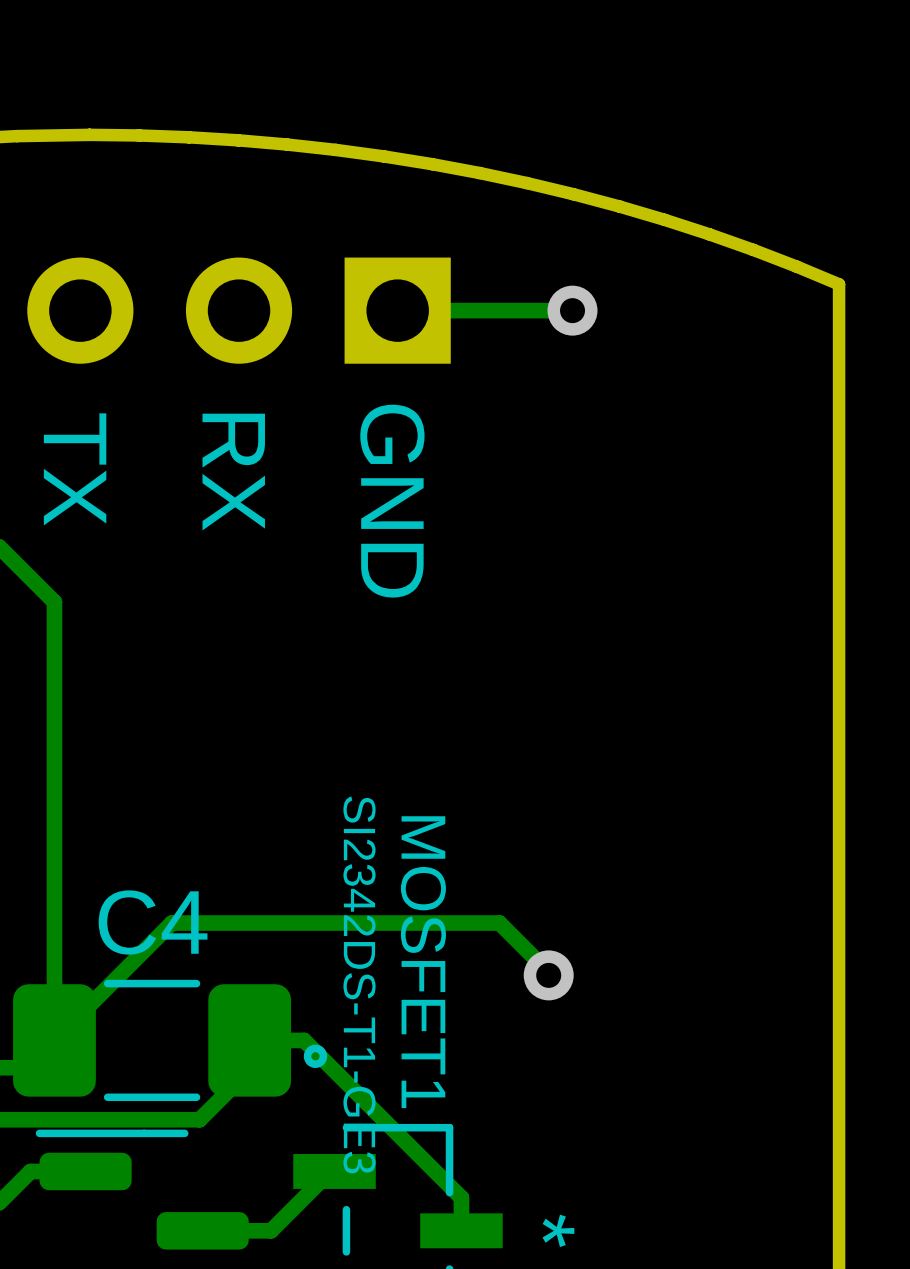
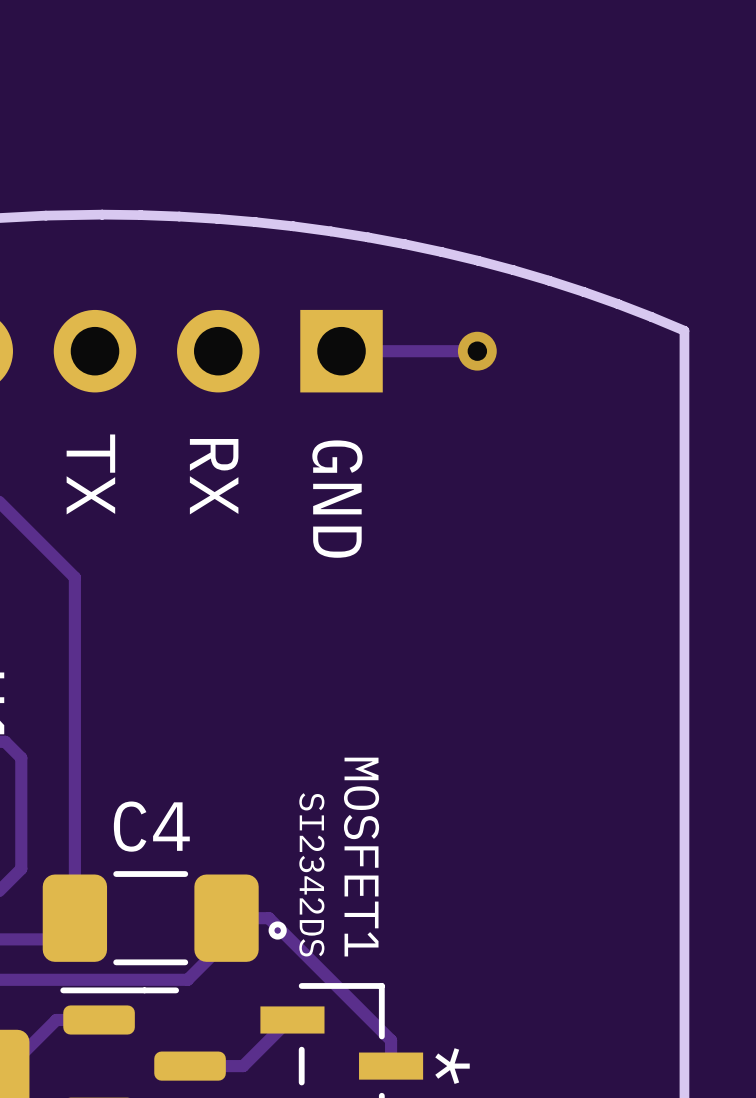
track: (548, 975) (548, 972) (499, 923) (171, 923) (54, 1040) -> none
via: (548, 975) -> none
MOSFET1 value: SI2342DS-T1-GE3 (359, 984) -> SI2342DS (311, 874)

